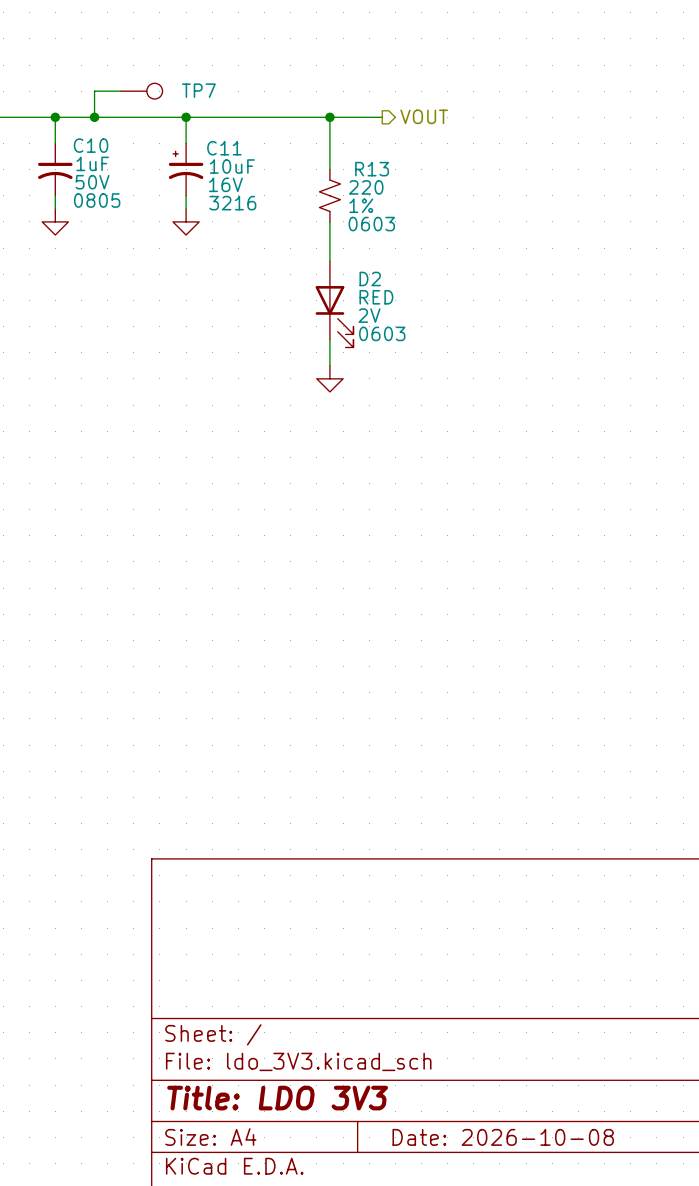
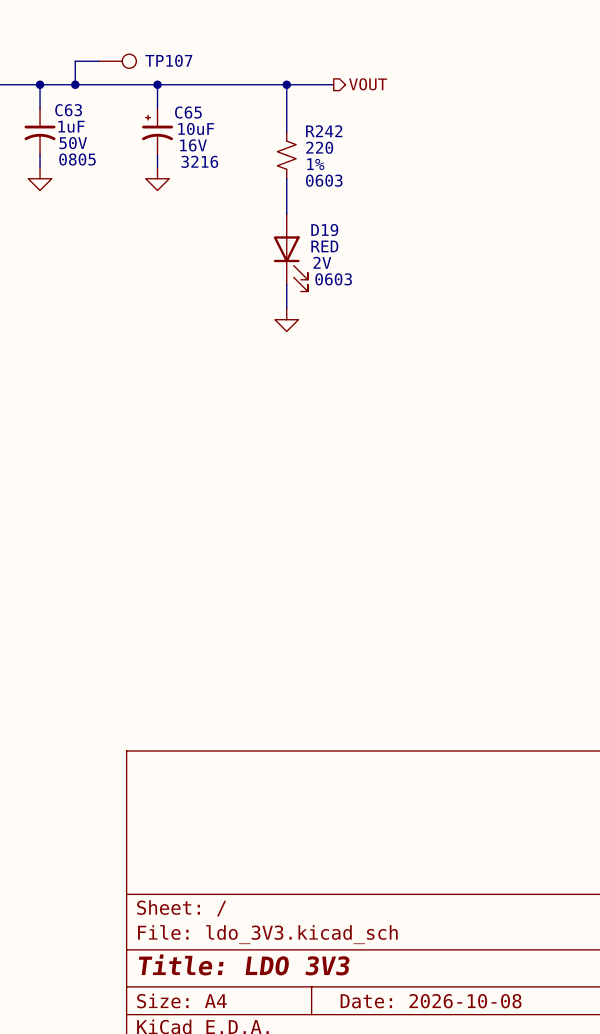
TP7 name: TP7 (198, 90) -> TP107 (168, 60)
C10 name: C10 (91, 145) -> C63 (68, 110)
C11 name: C11 (224, 148) -> C65 (188, 112)
R13 name: R13 (372, 169) -> R242 (324, 131)
D2 name: D2 (370, 278) -> D19 (324, 230)

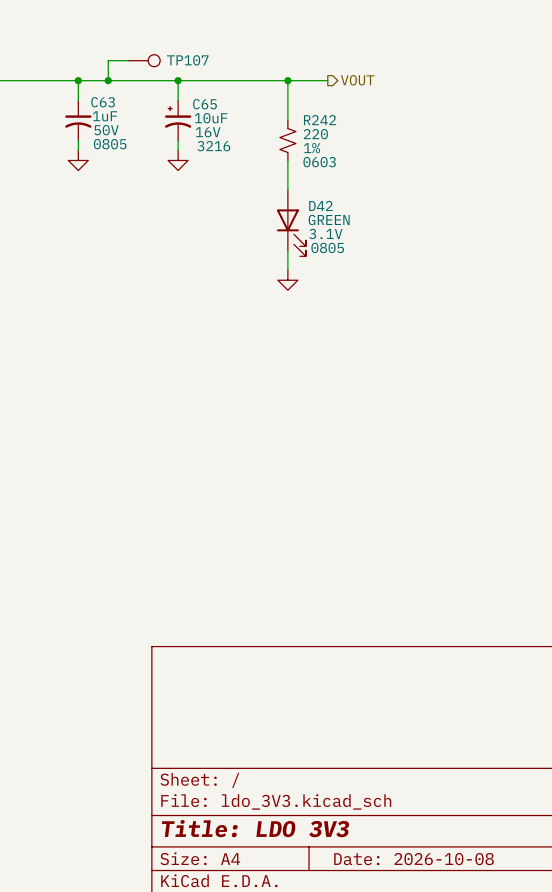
D19 name: D19 (324, 230) -> D42 (320, 205)
D19 value: RED (324, 246) -> GREEN (329, 219)
D19 text: 2V (322, 262) -> 3.1V (325, 233)
D19 text: 0603 (333, 279) -> 0805 (327, 247)

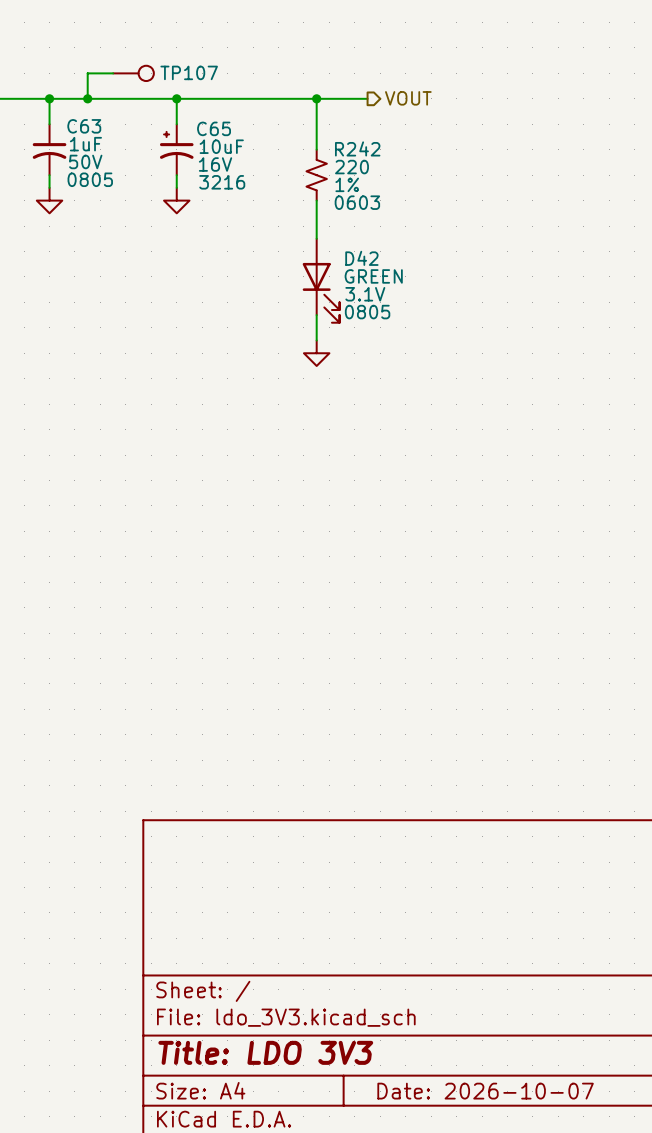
title block: Date: 2026-10-08 (414, 859) -> Date: 2026-10-07 (485, 1091)

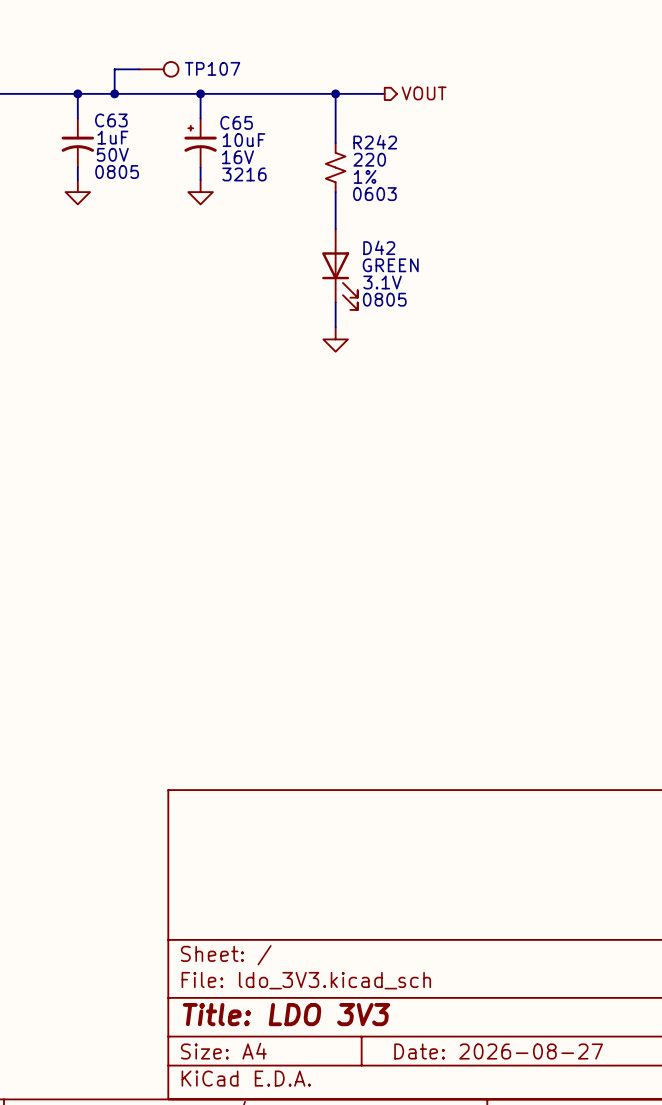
title block: Date: 2026-10-07 (485, 1091) -> Date: 2026-08-27 (498, 1051)

